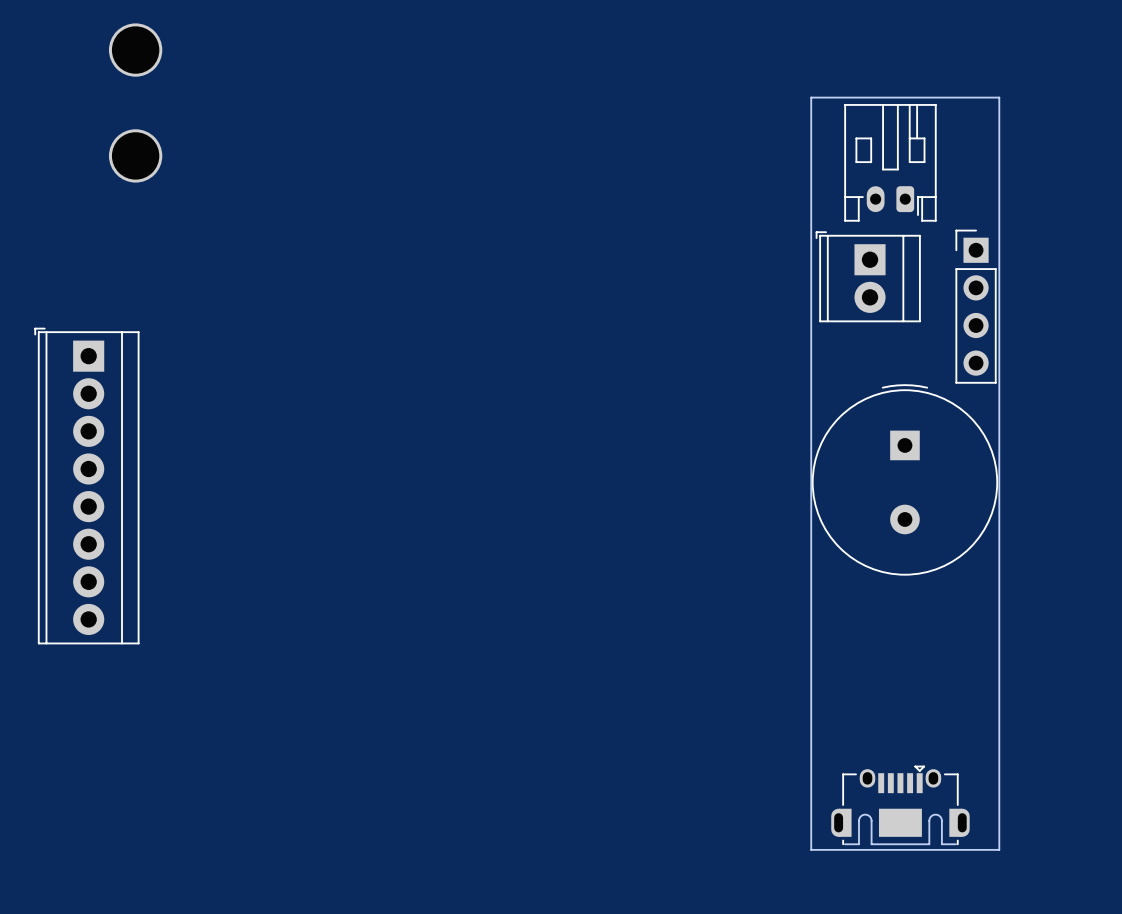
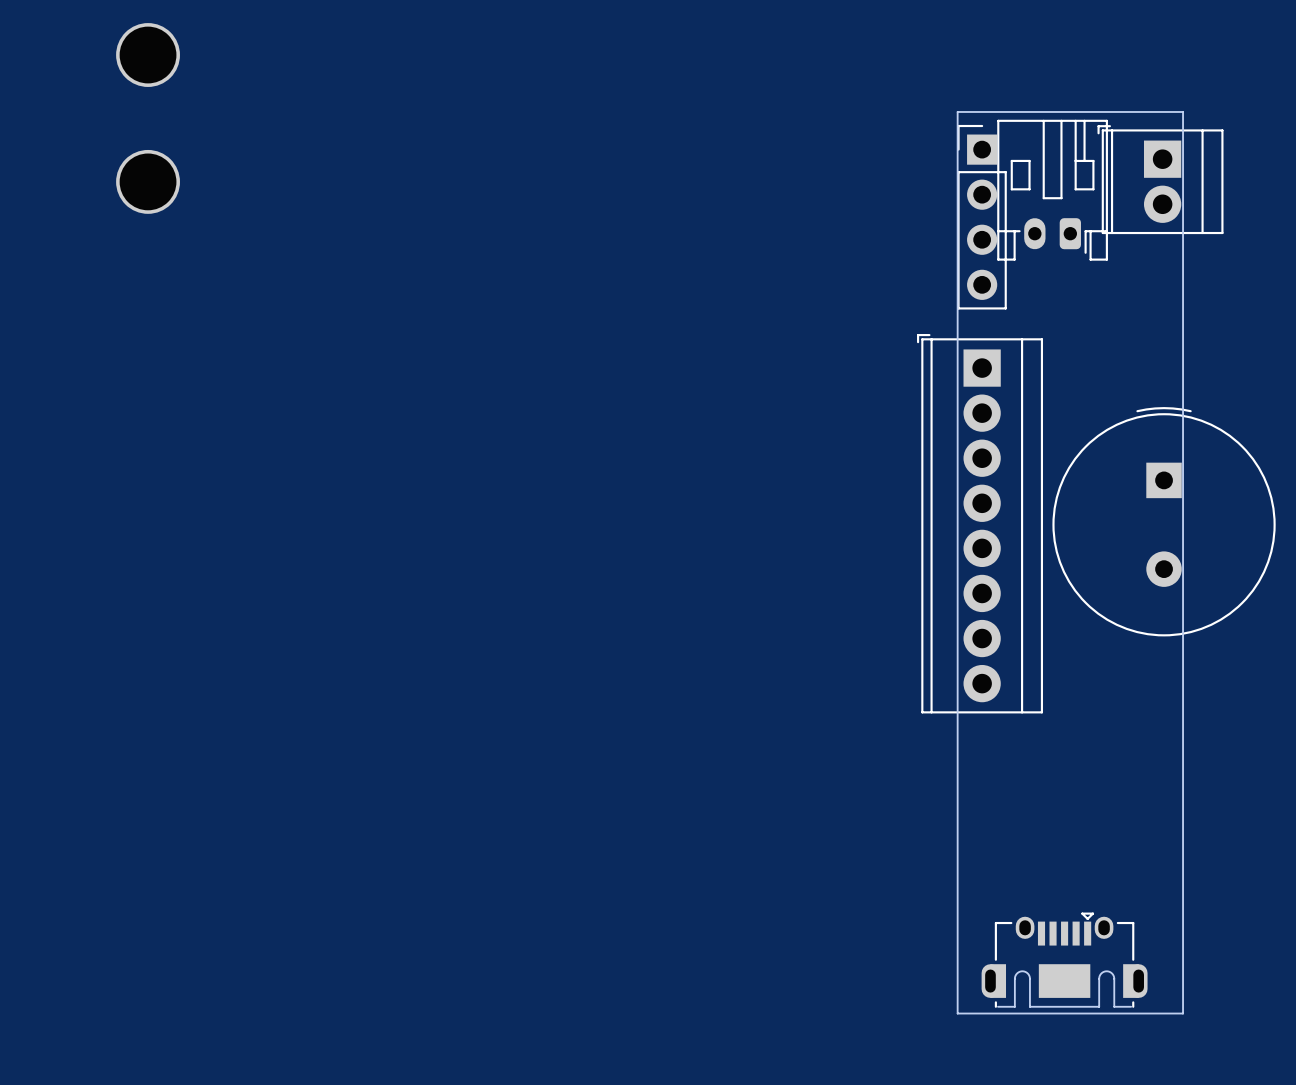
part position: (868, 276) -> (1160, 179)
part position: (976, 306) -> (982, 217)
part: none -> (980, 523)
part position: (904, 479) -> (1164, 521)
part: (86, 486) -> none

